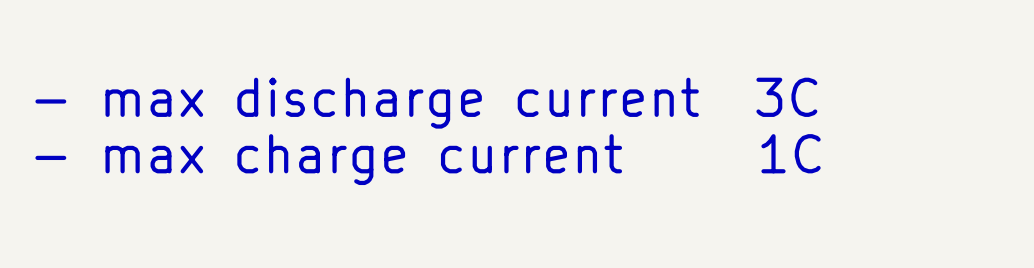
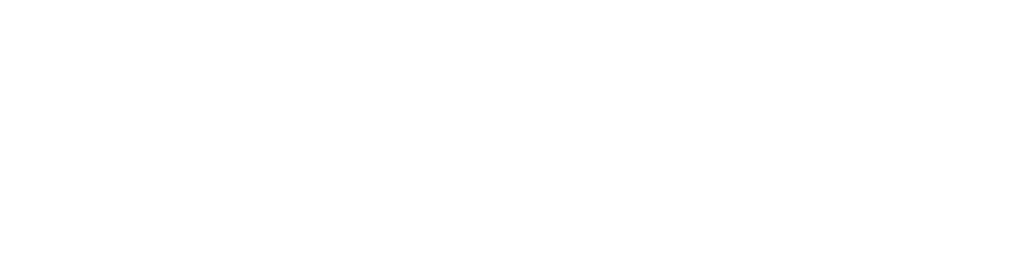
text: - max discharge current 3C (426, 103) -> none
text: - max charge current 1C (428, 159) -> none

